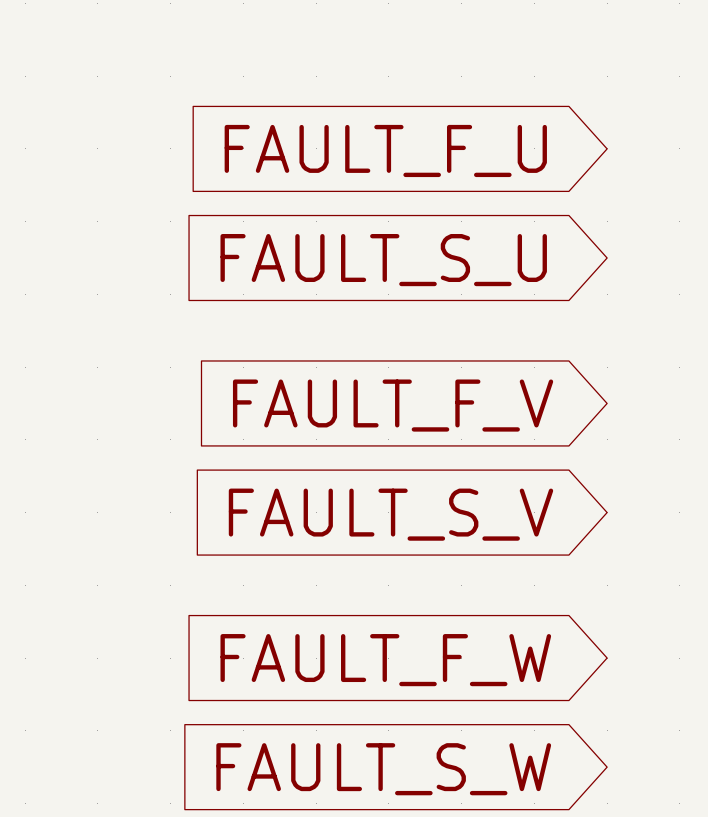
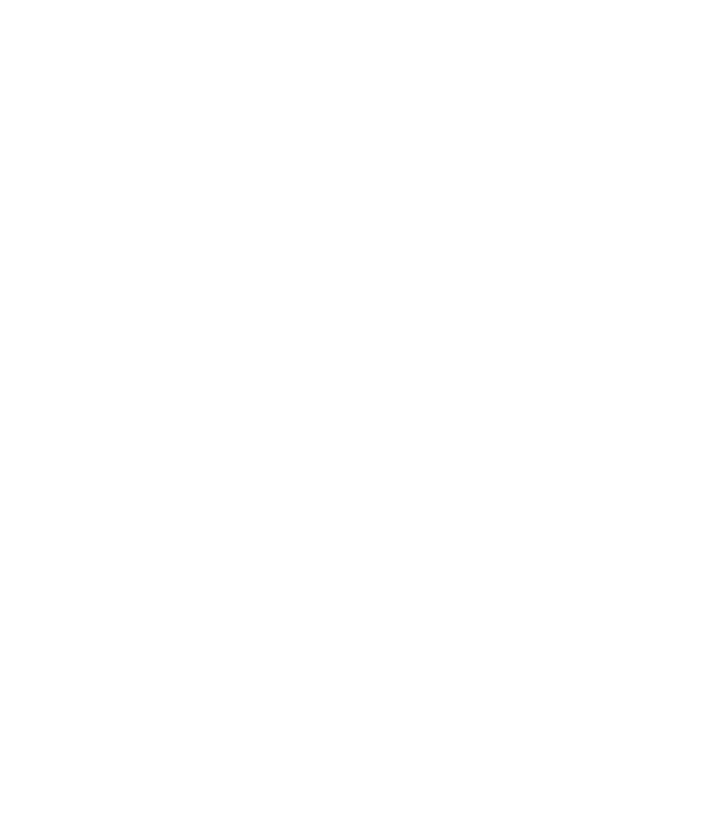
global label: FAULT_F_U (385, 150) -> none
global label: FAULT_S_U (383, 260) -> none
global label: FAULT_F_V (393, 405) -> none
global label: FAULT_S_V (390, 514) -> none
global label: FAULT_F_W (385, 660) -> none
global label: FAULT_S_W (383, 769) -> none

